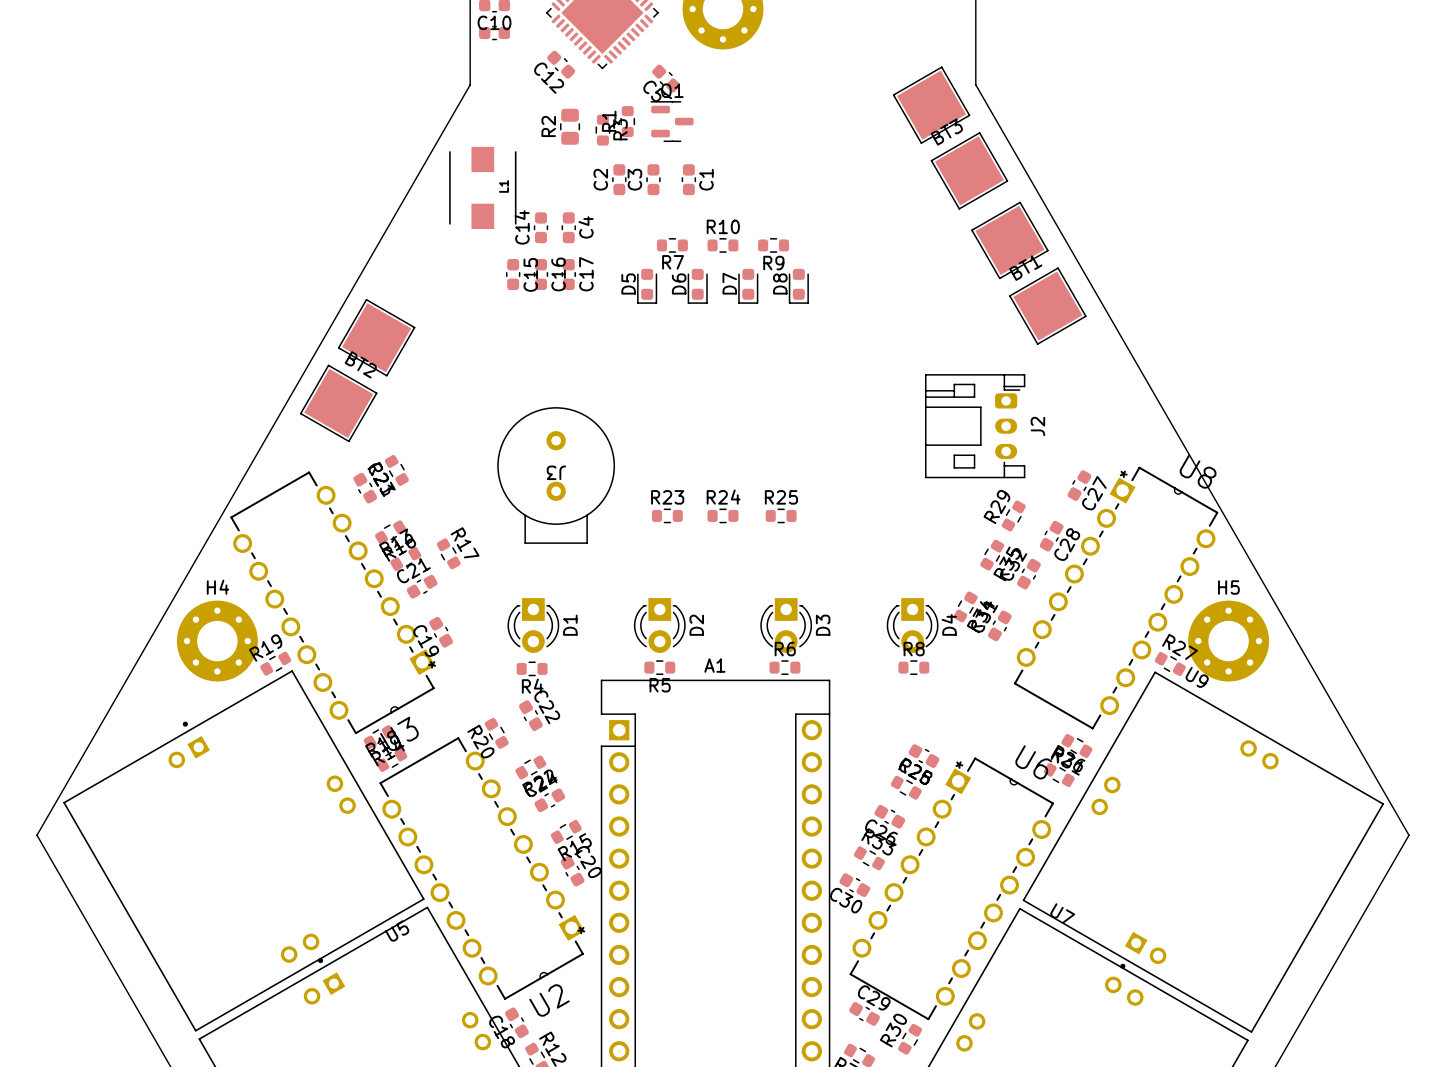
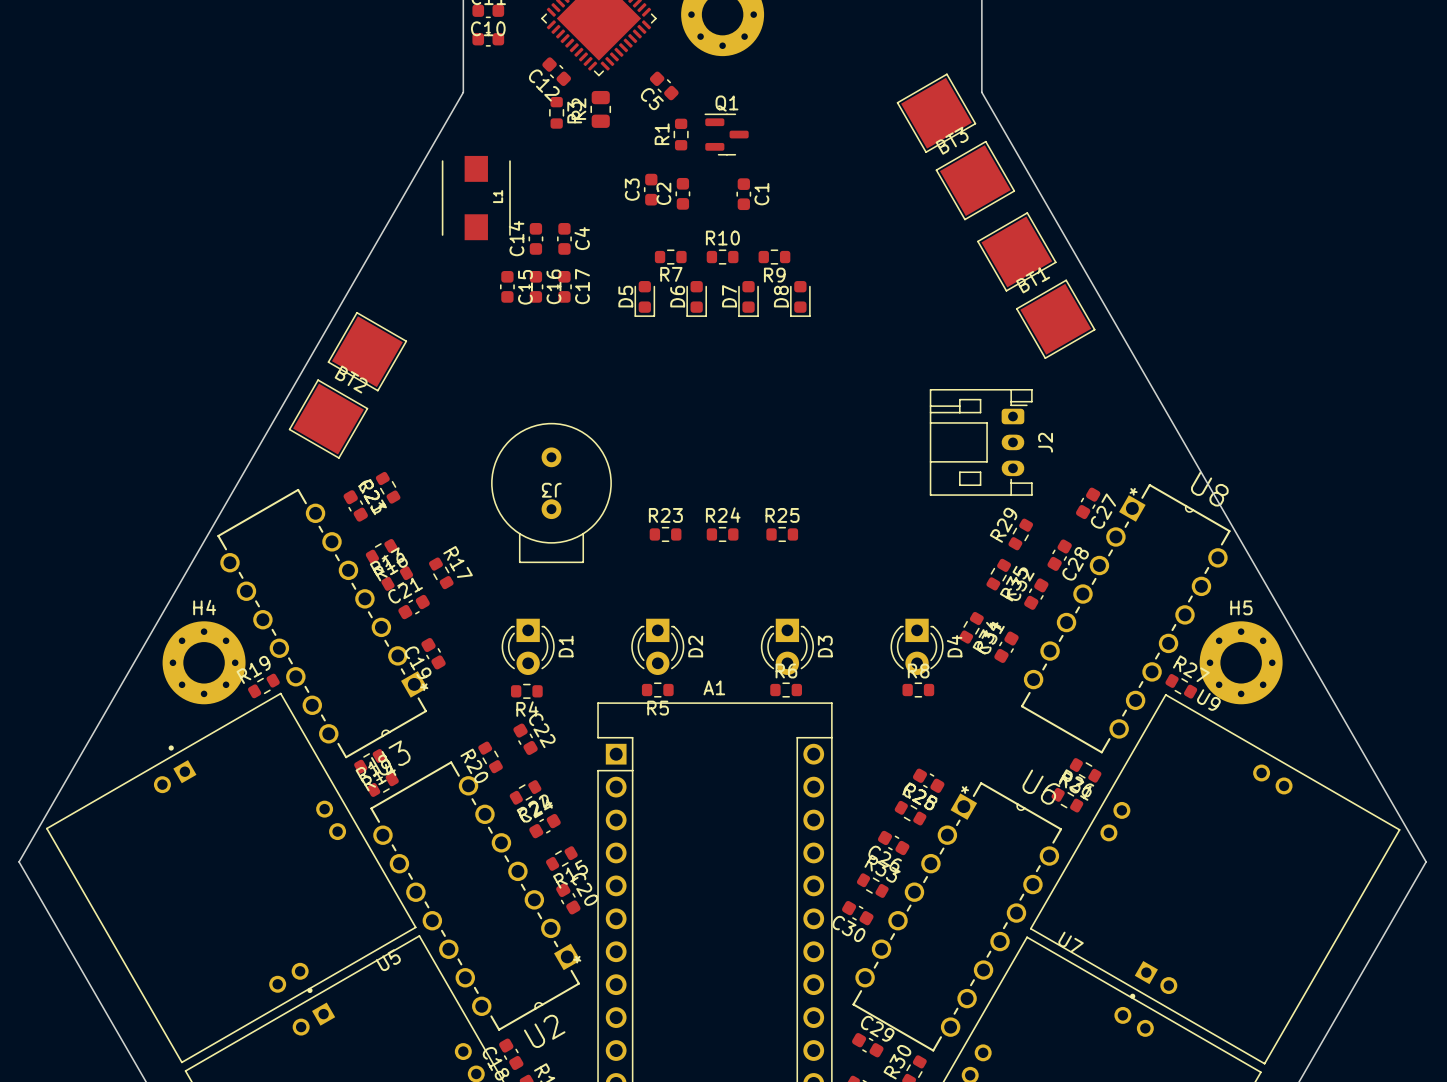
R1 position: (627, 121) -> (681, 134)
Q1 position: (672, 121) -> (726, 134)
R2 position: (570, 126) -> (600, 109)
R3 position: (602, 130) -> (556, 112)
C2 position: (619, 179) -> (682, 193)
C1 position: (688, 179) -> (743, 194)

